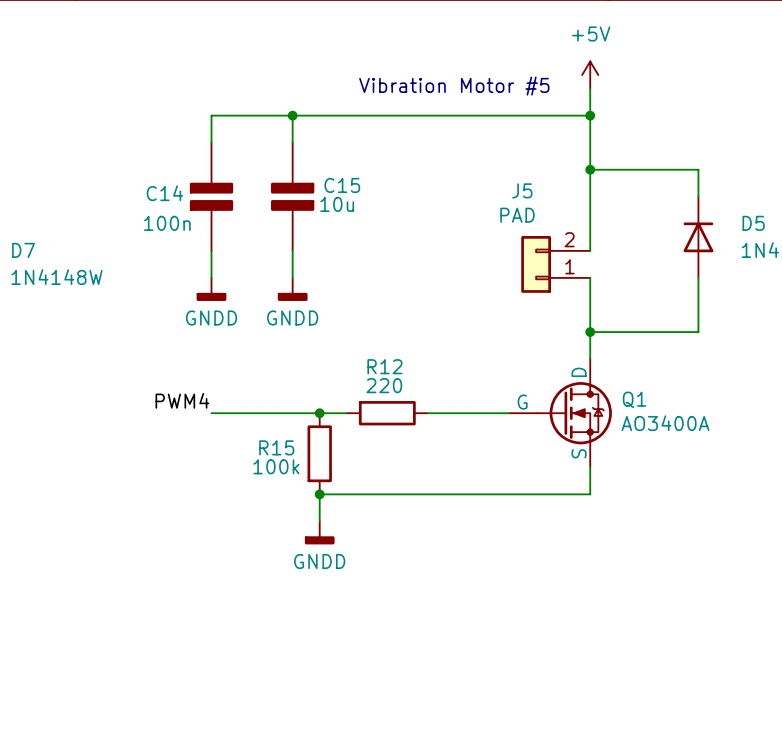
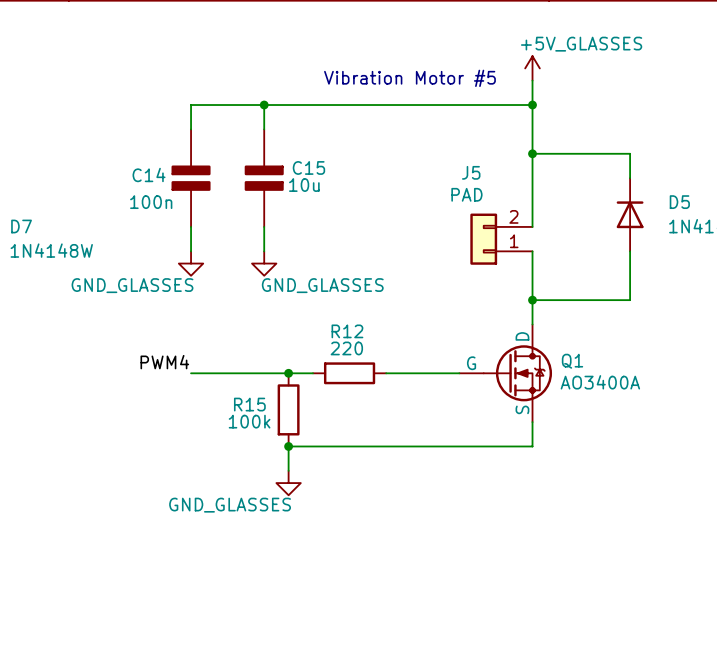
power symbol: +5V (590, 75) -> +5V_GLASSES (532, 68)
power symbol: GNDD (211, 289) -> GND_GLASSES (191, 263)
power symbol: GNDD (292, 289) -> GND_GLASSES (264, 263)
power symbol: GNDD (319, 532) -> GND_GLASSES (288, 483)

